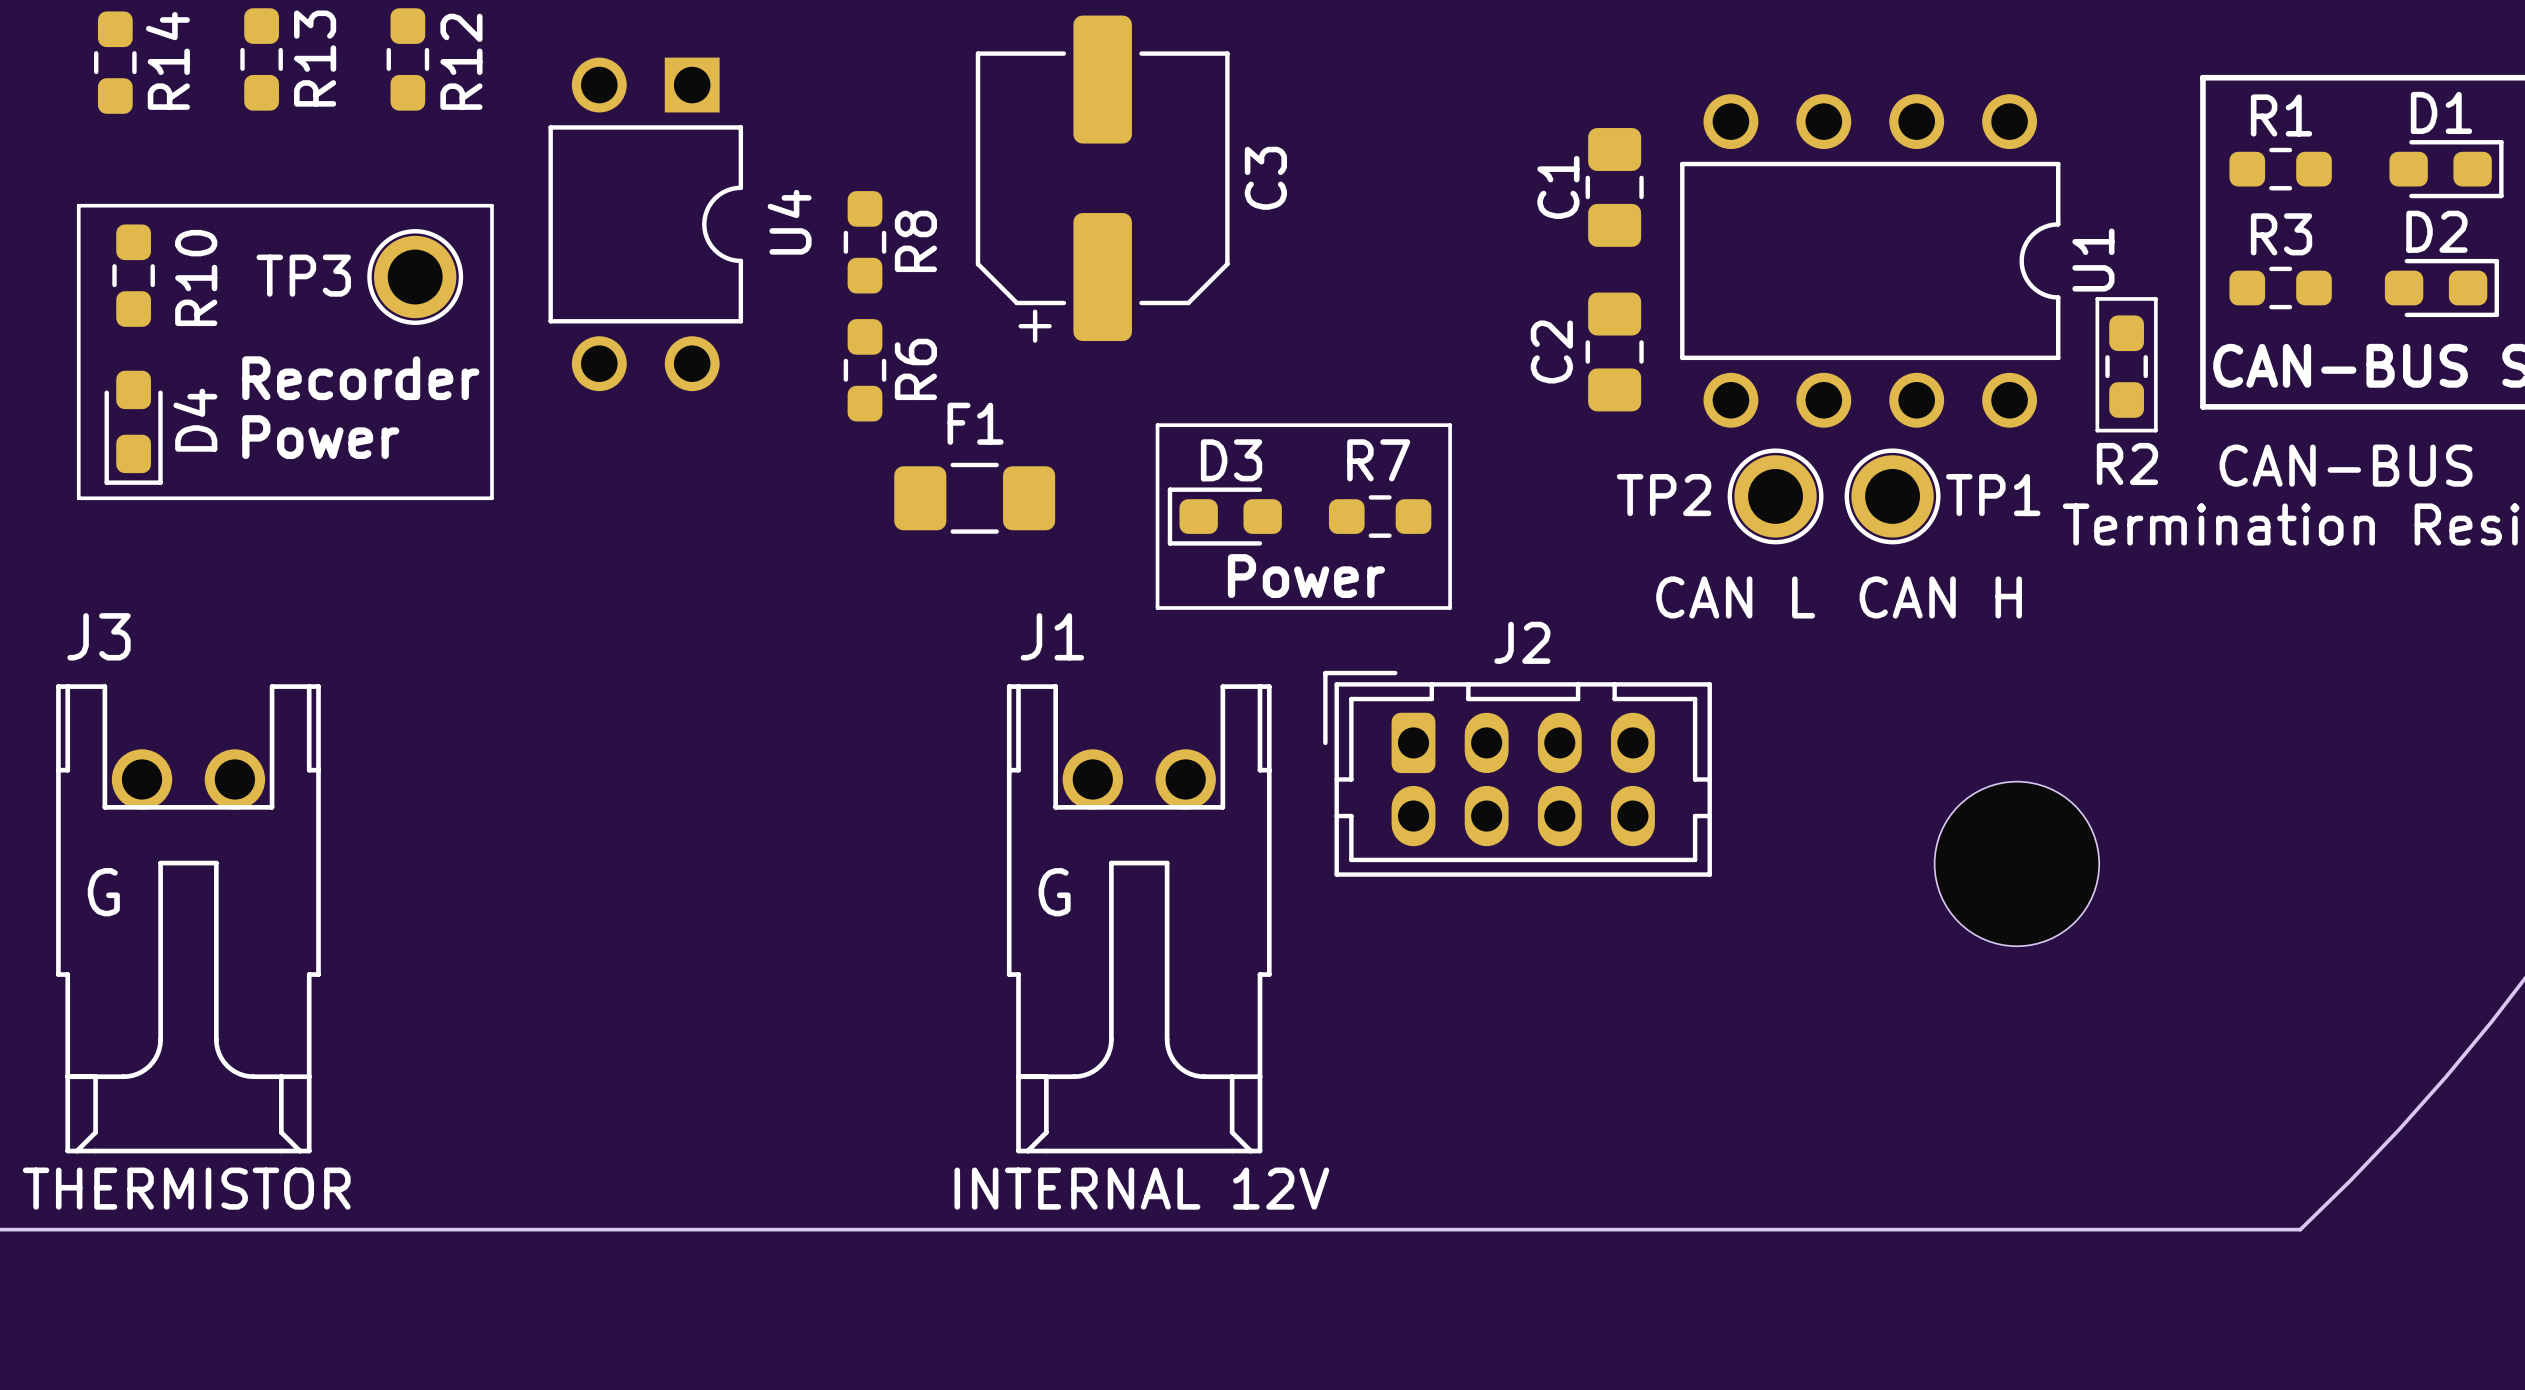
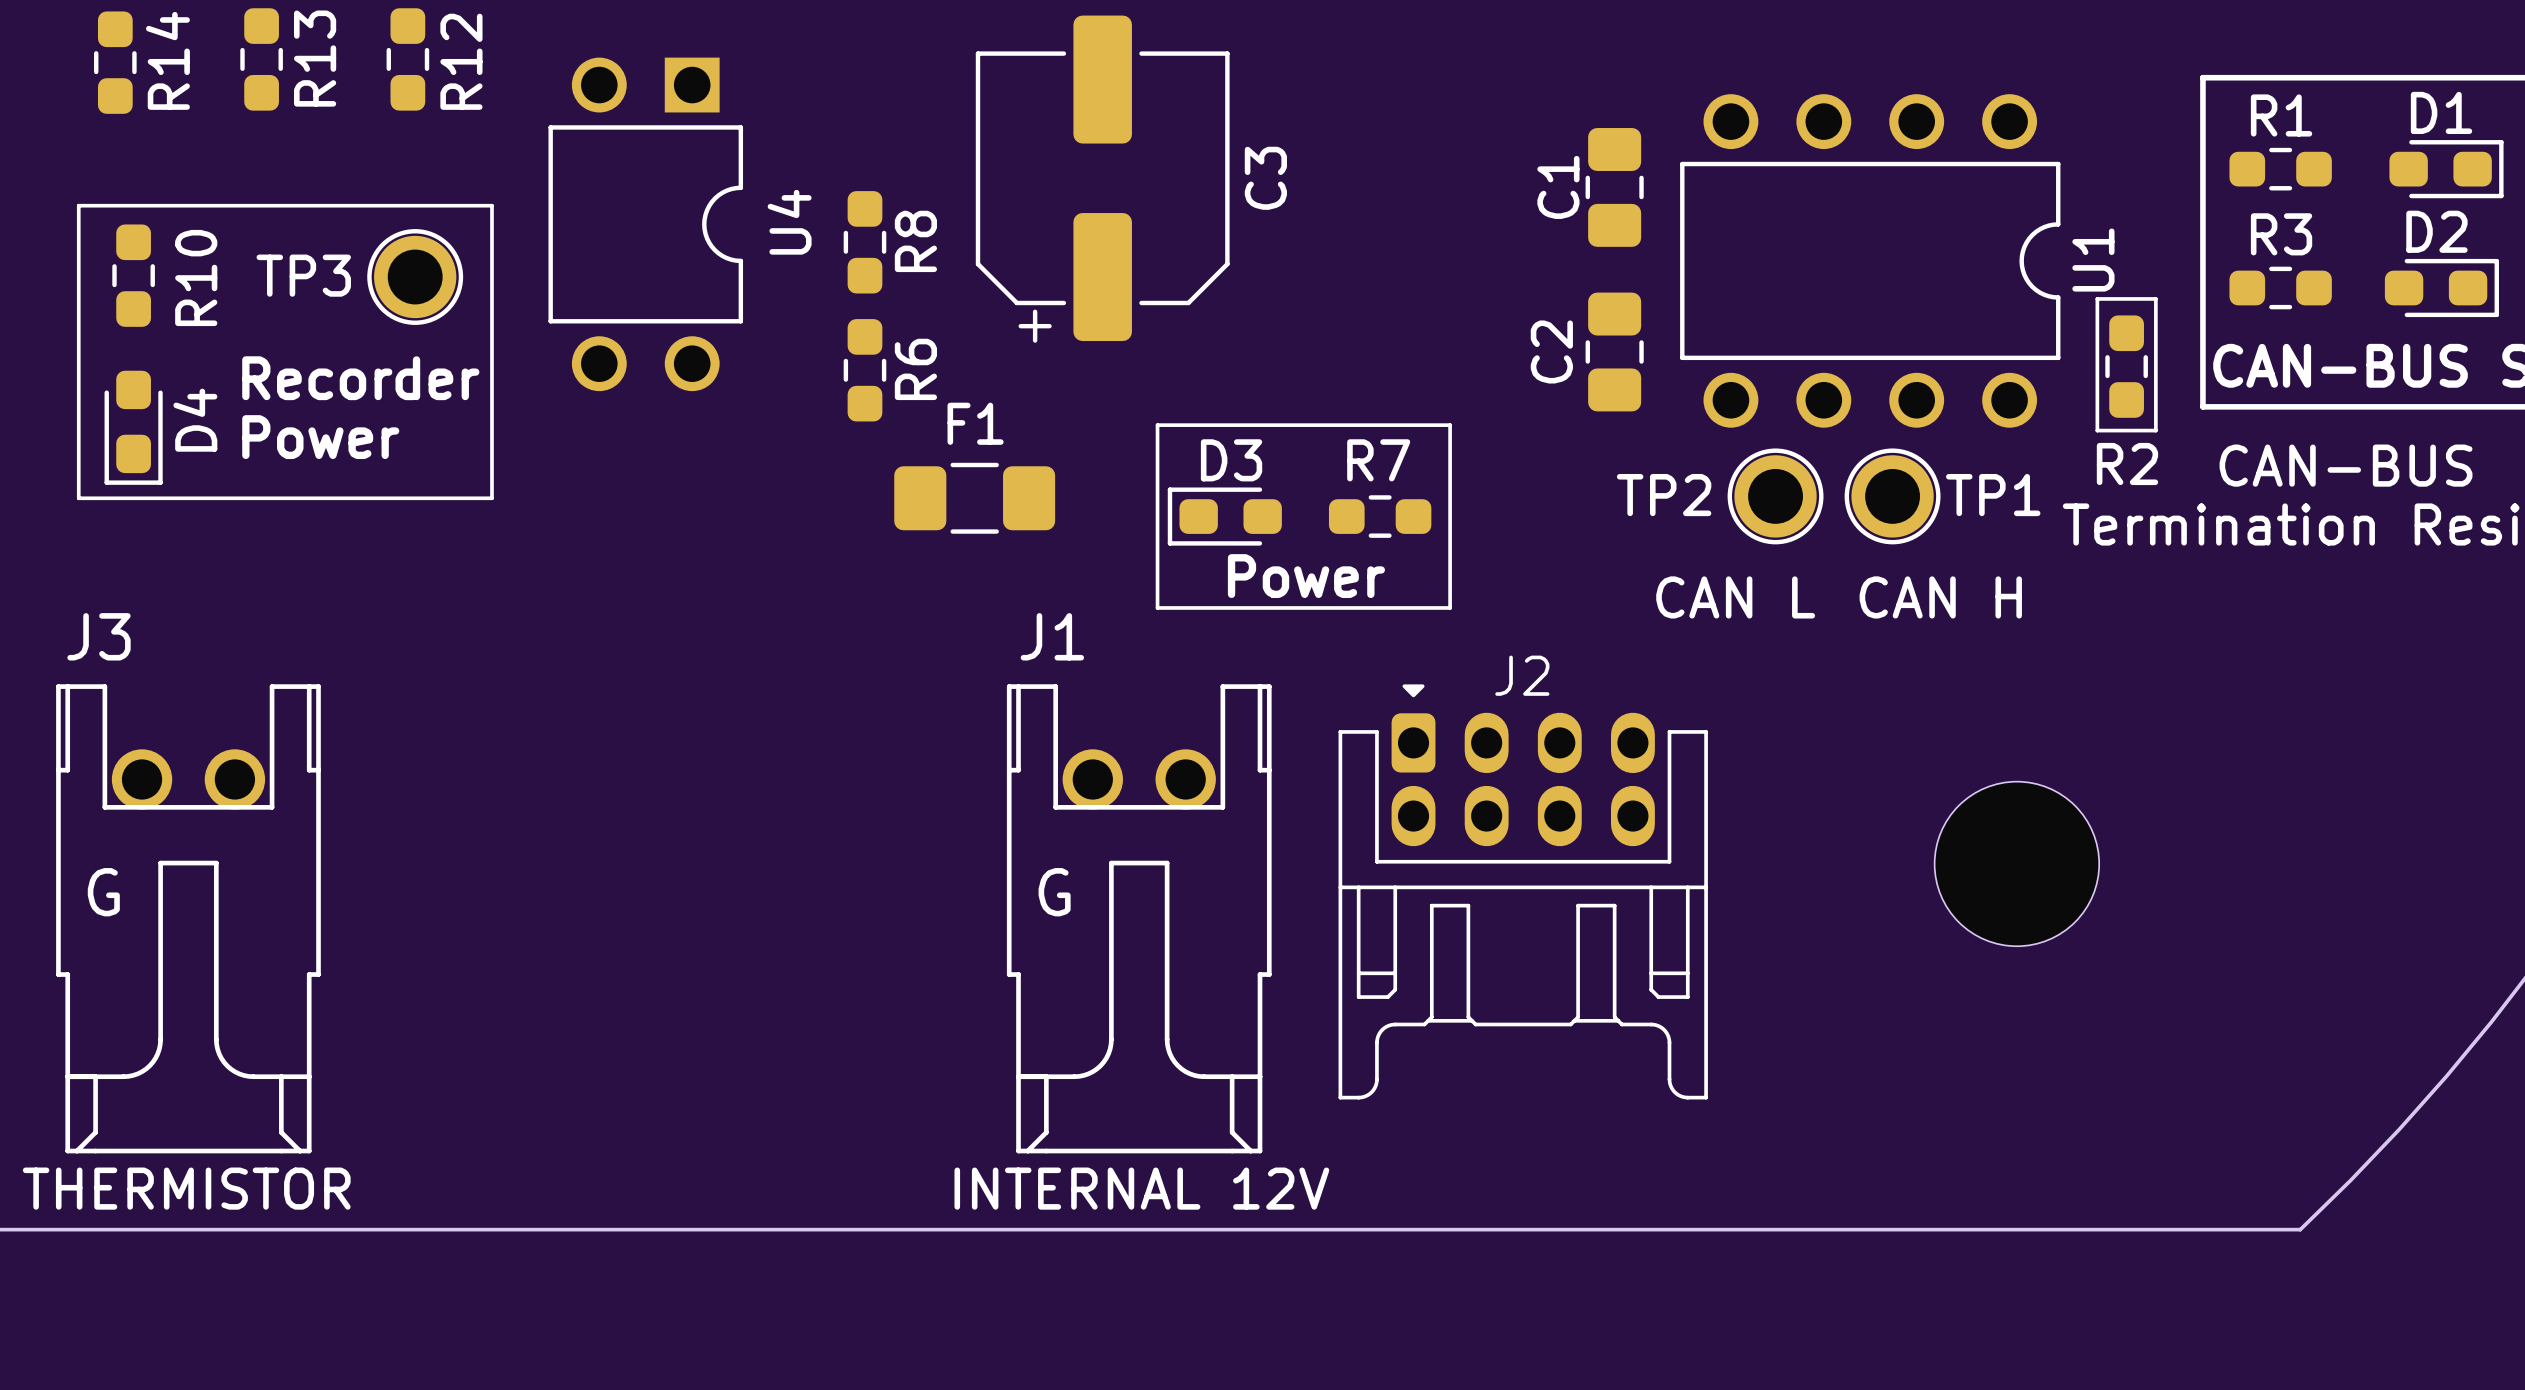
J2 name position: J2 (1522, 642) -> J2 (1522, 675)
J2 footprint: [1323, 670, 1712, 877] -> [1338, 684, 1708, 1100]

